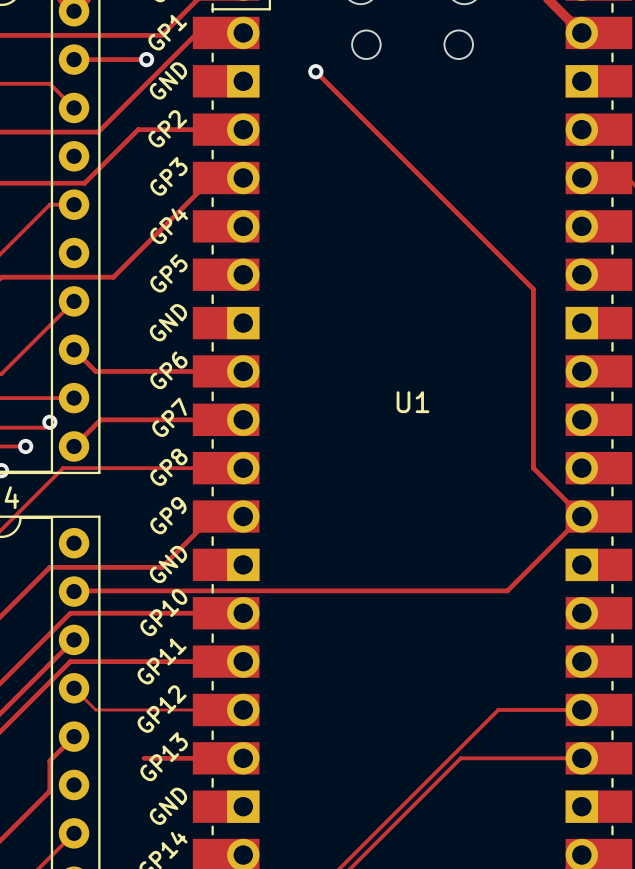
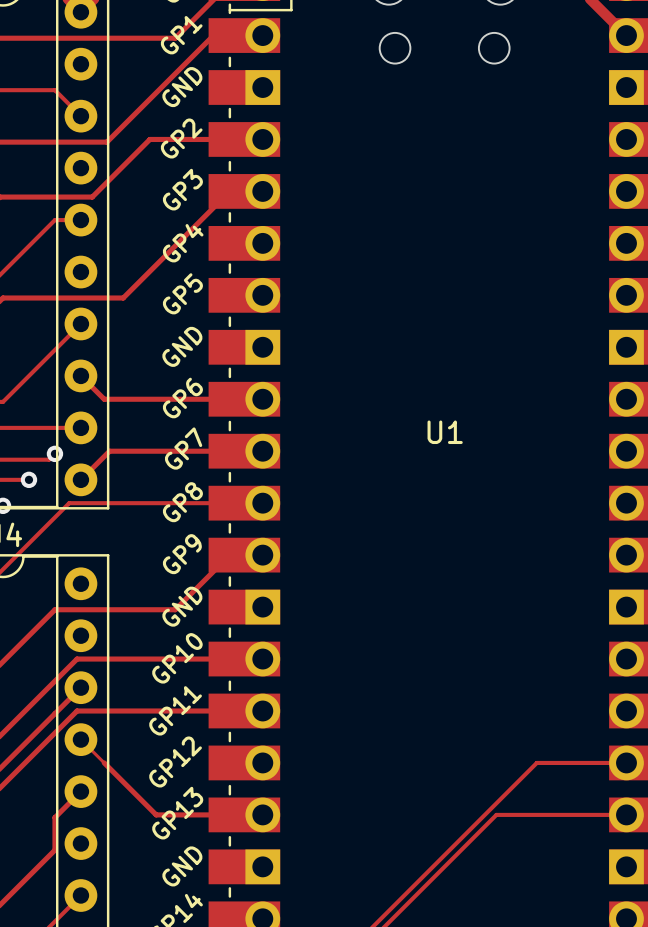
track: (74, 59) (146, 59) -> none
via: (146, 59) -> none
track: (315, 71) (533, 289) (533, 468) (581, 516) (507, 590) (74, 591) -> none
via: (315, 71) -> none
track: (95, 709) (243, 709) -> (104, 762) (156, 814)

